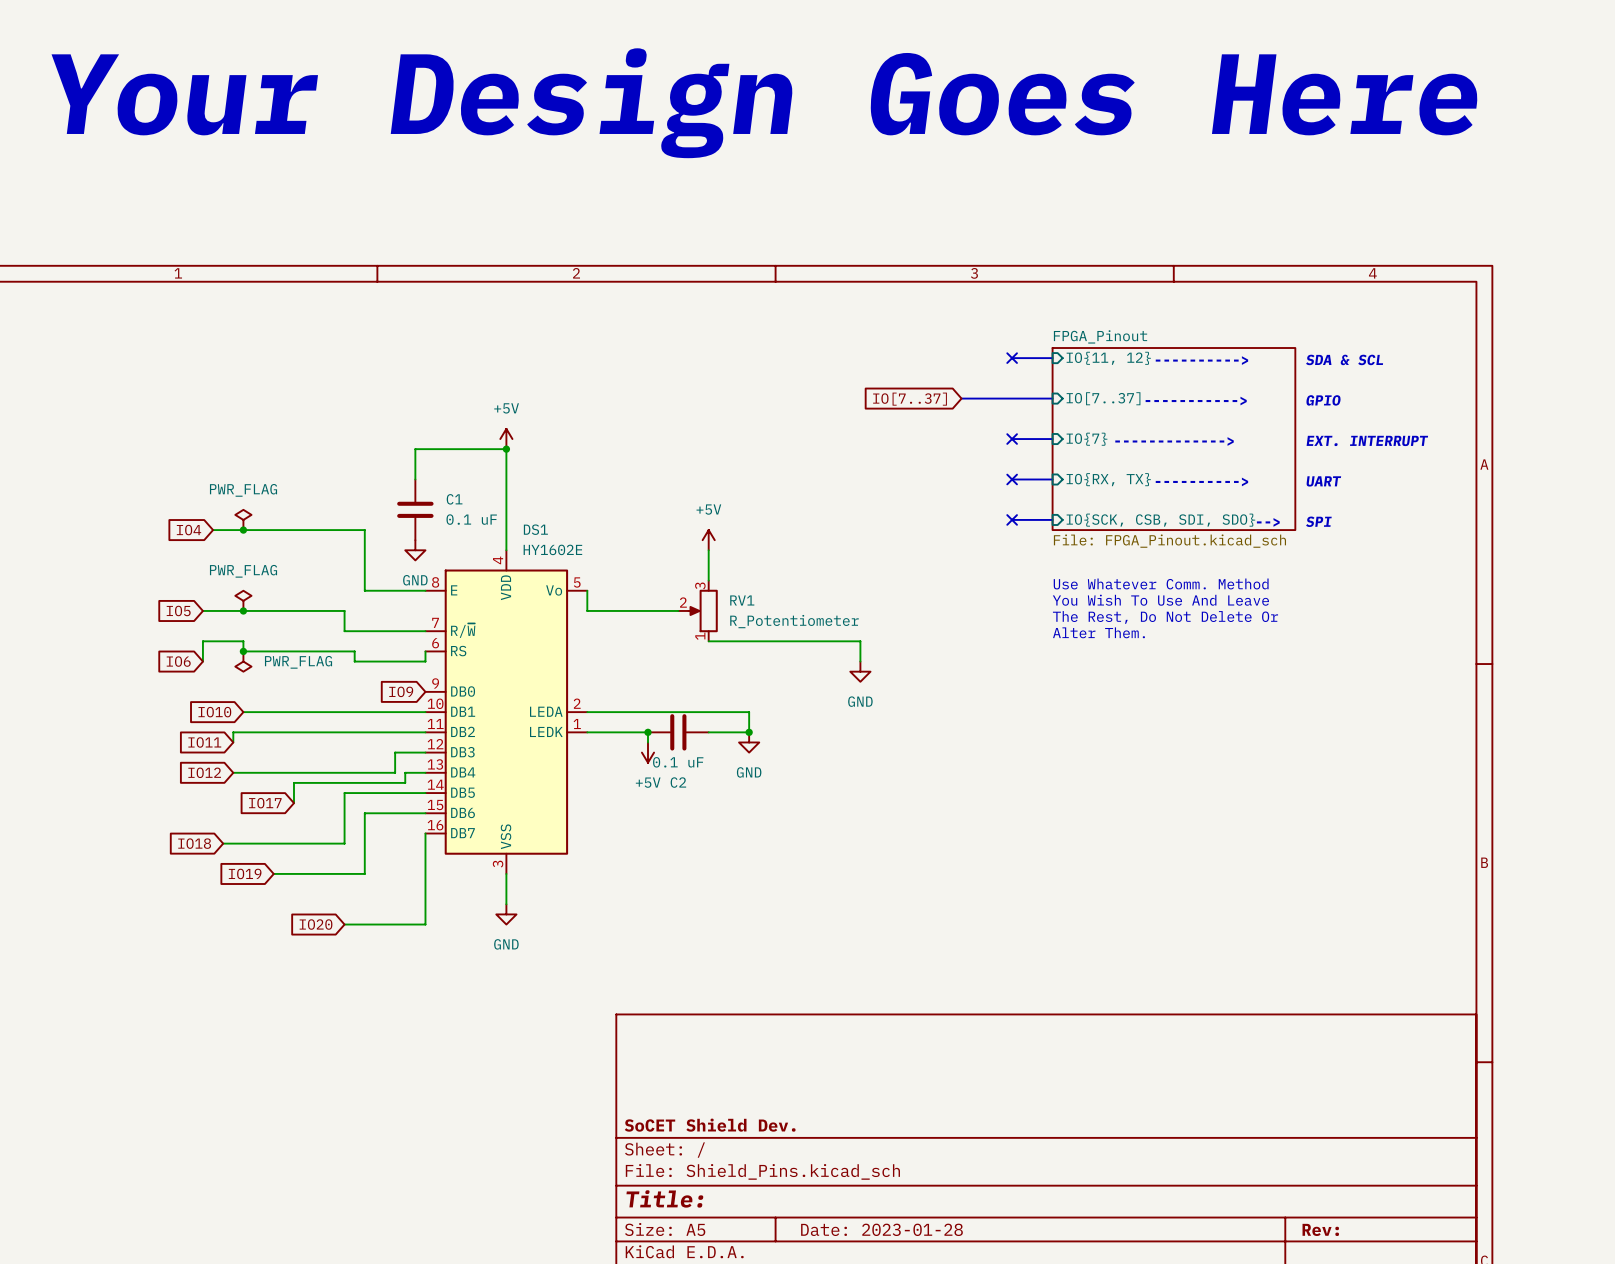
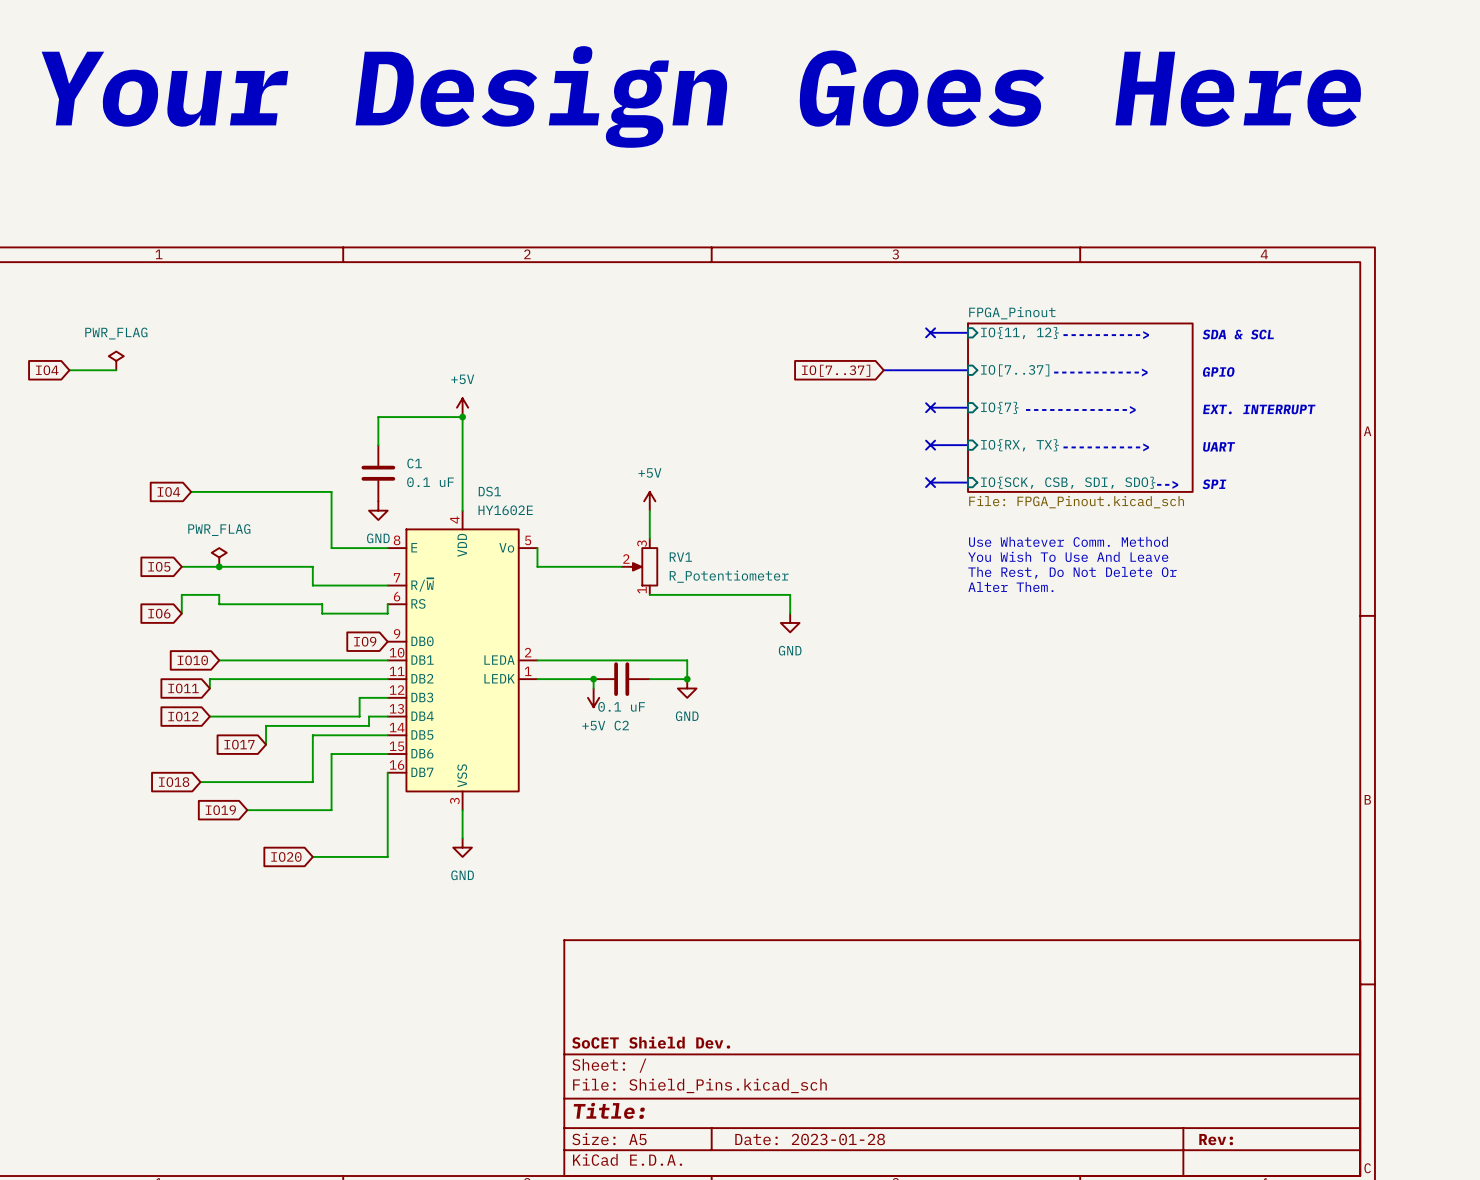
power symbol: none -> PWR_FLAG (116, 360)
global label: none -> IO4 (47, 370)
wire: none -> (69, 370) (116, 370)
power symbol: PWR_FLAG (243, 519) -> none
junction: (243, 530) -> none
junction: (243, 651) -> none
power symbol: PWR_FLAG (243, 661) -> none

